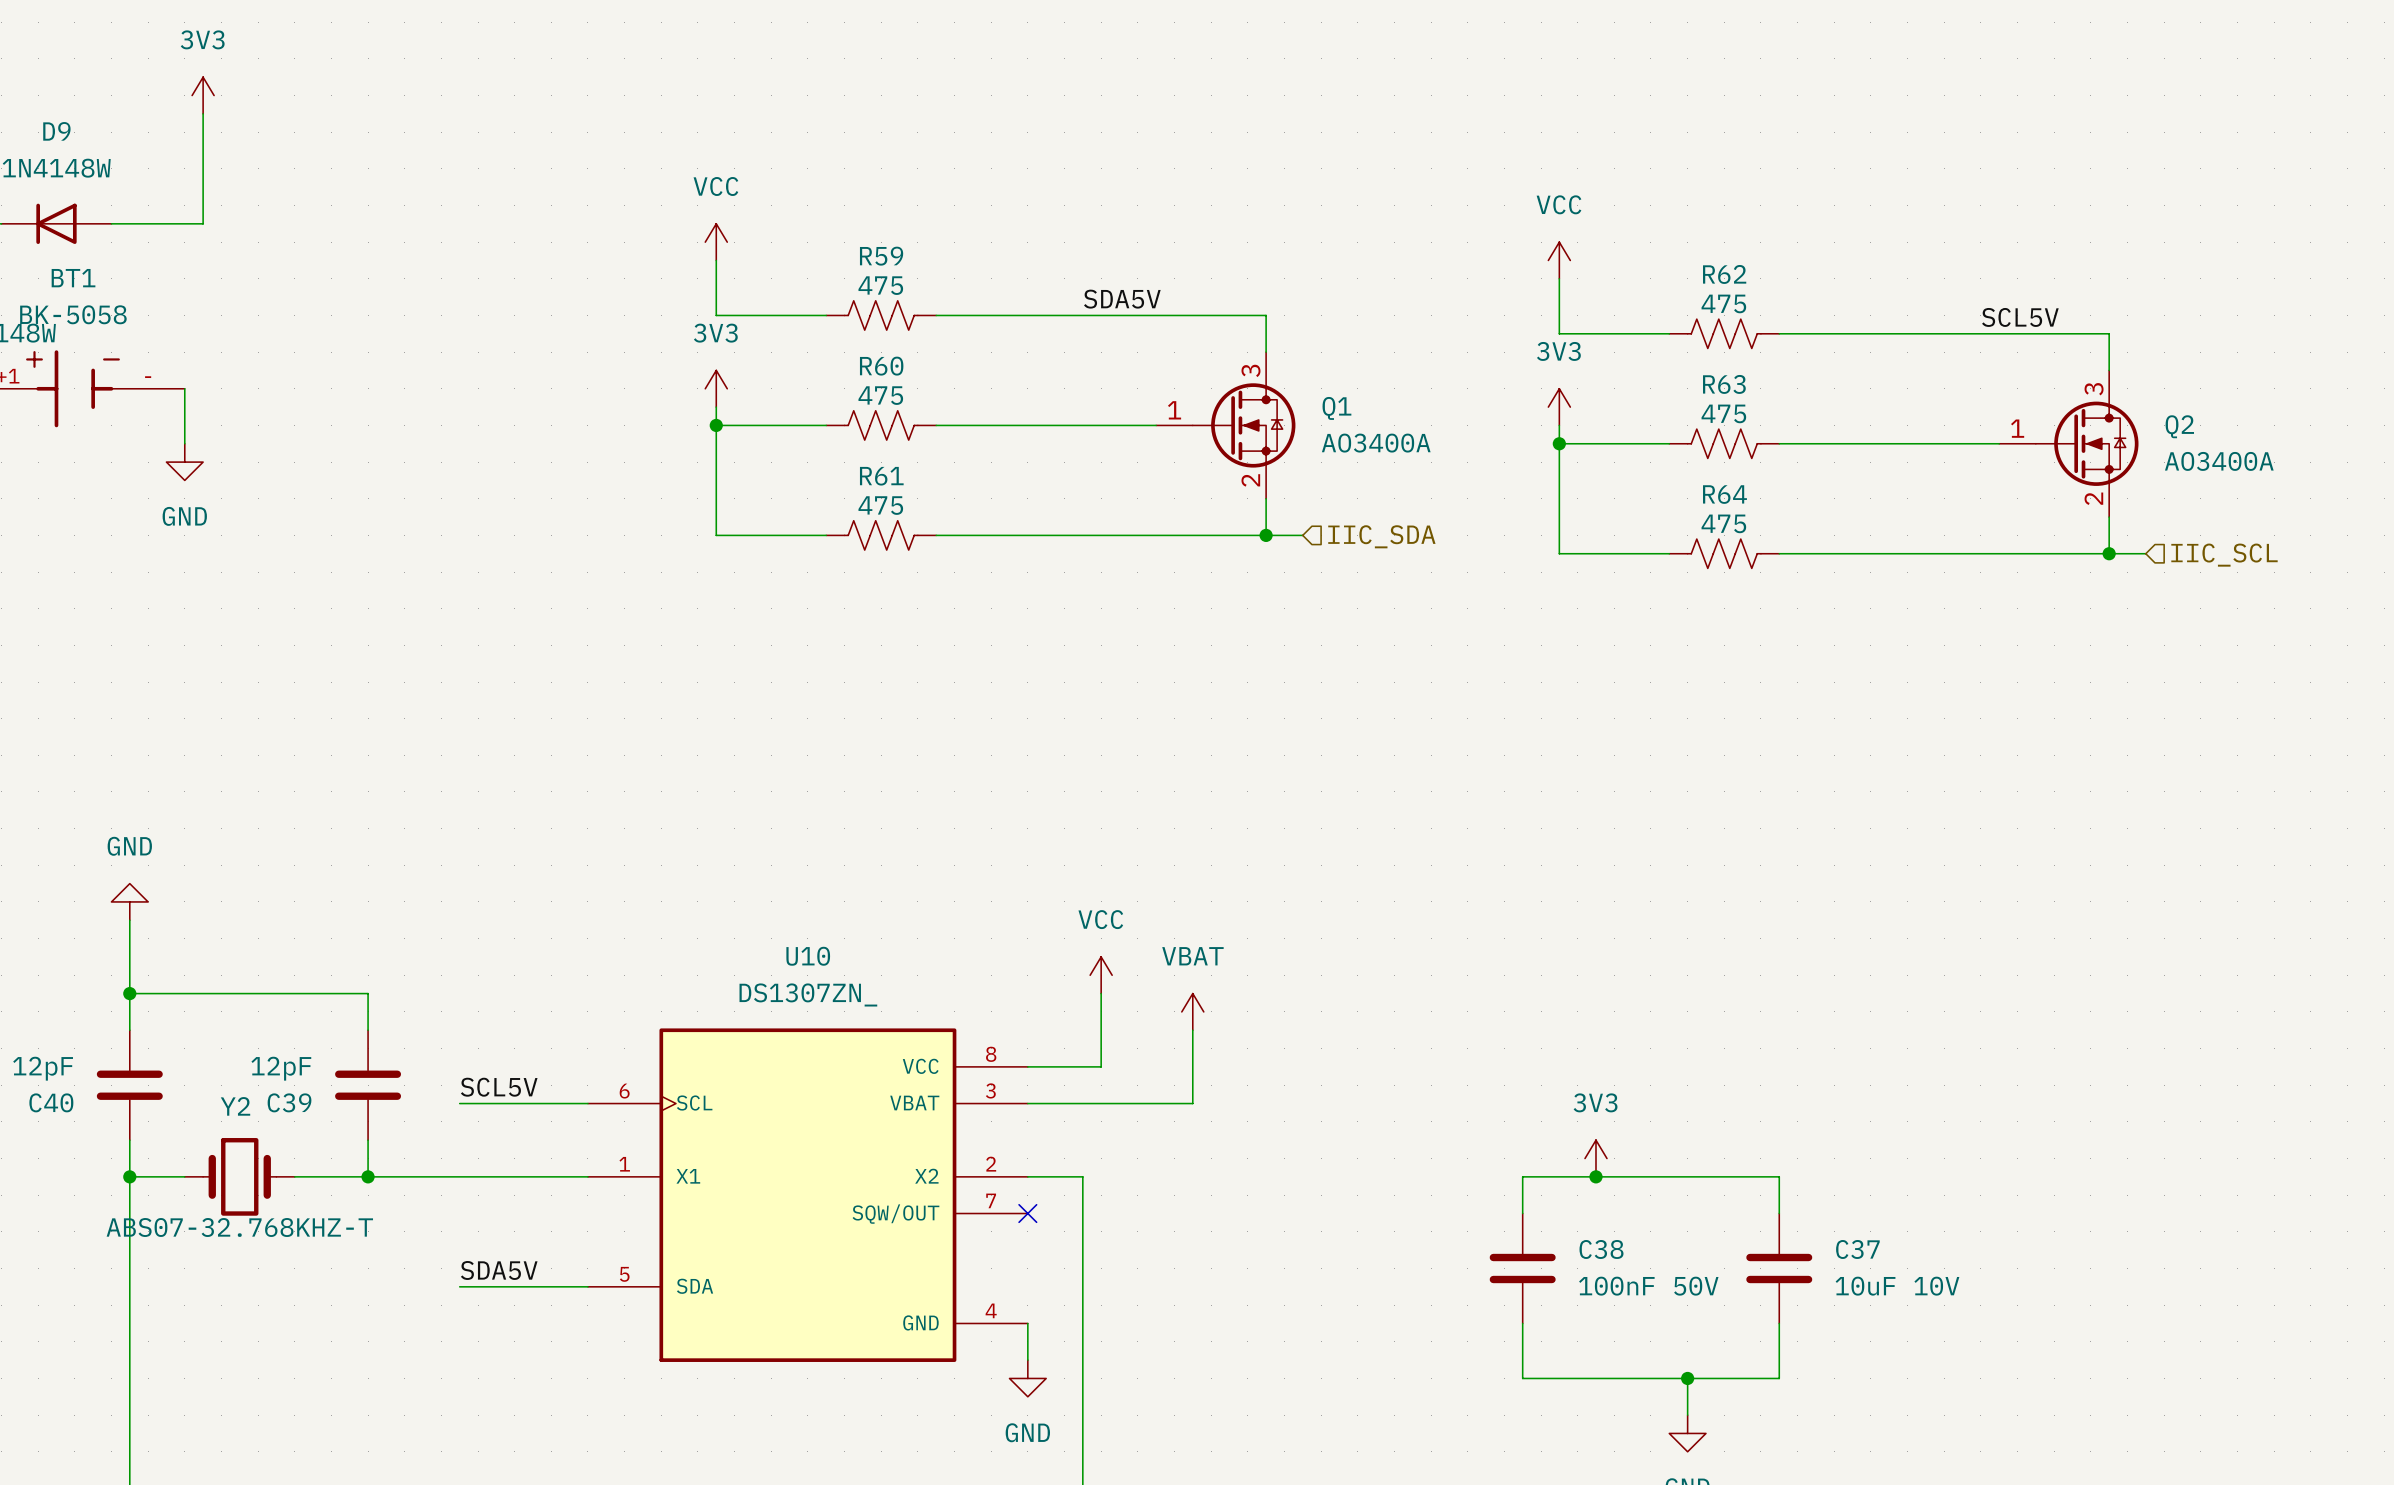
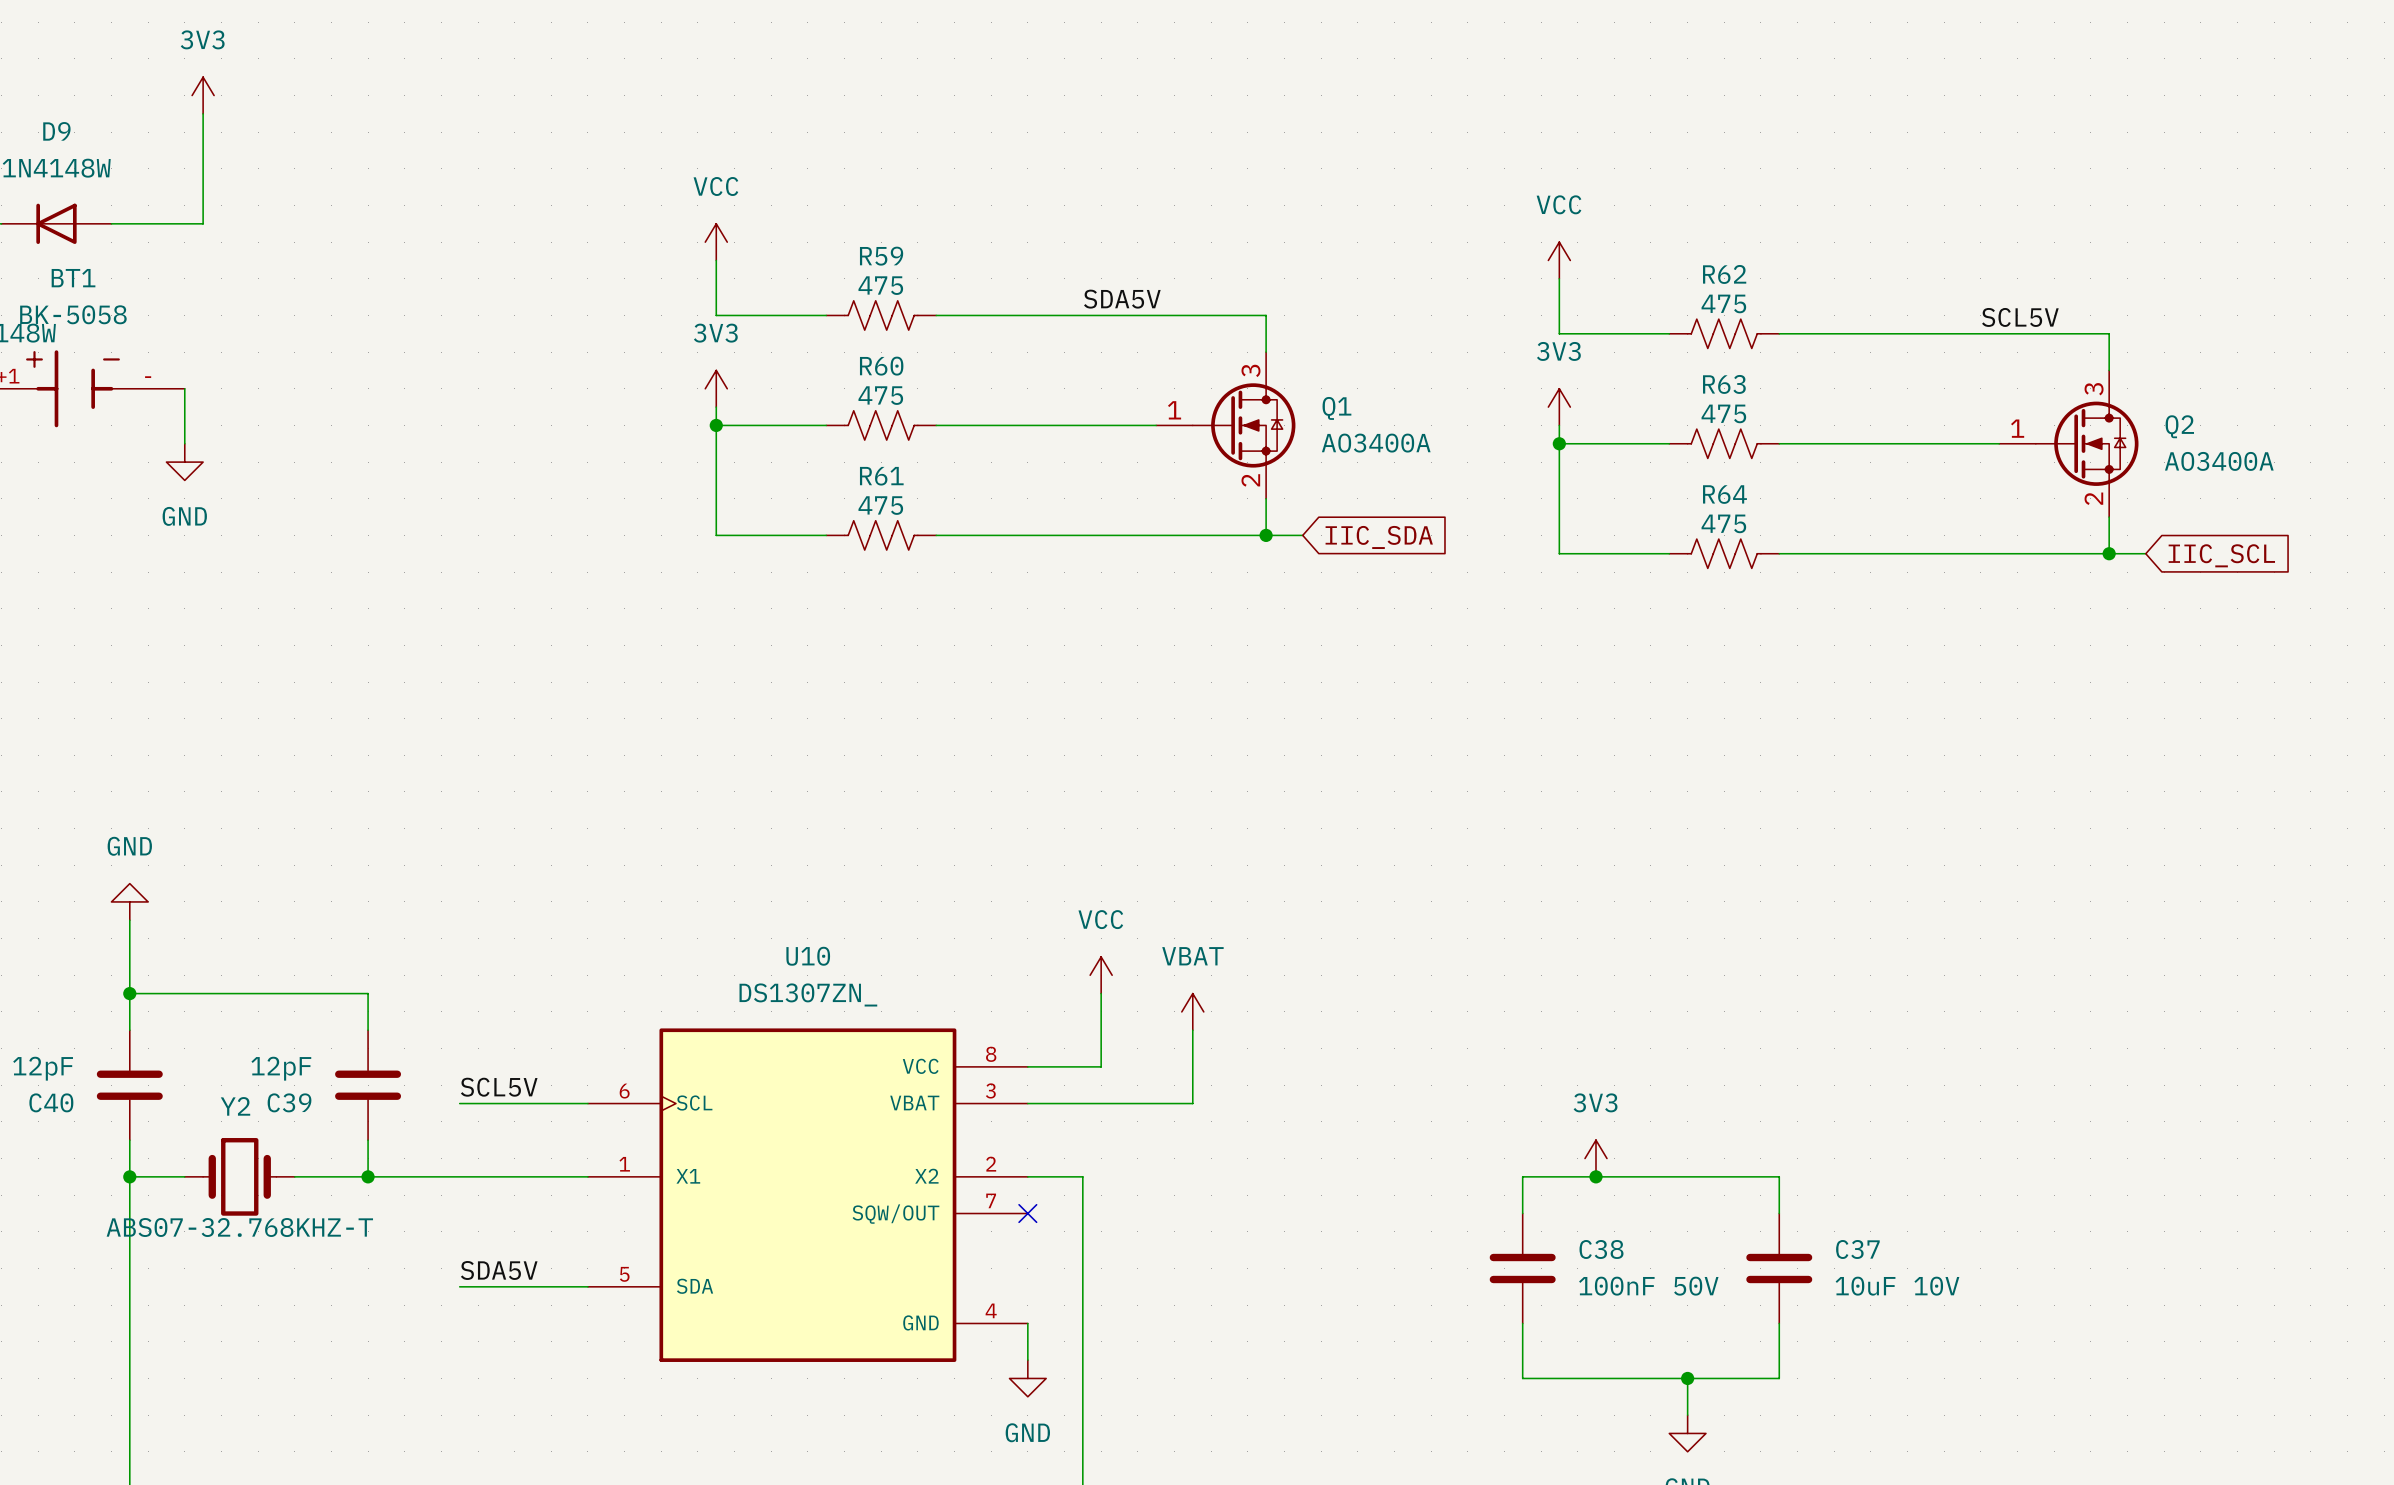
hierarchical label: IIC_SDA (1381, 536) -> none
global label: none -> IIC_SDA (1379, 537)
global label: none -> IIC_SCL (2221, 555)
hierarchical label: IIC_SCL (2224, 555) -> none

